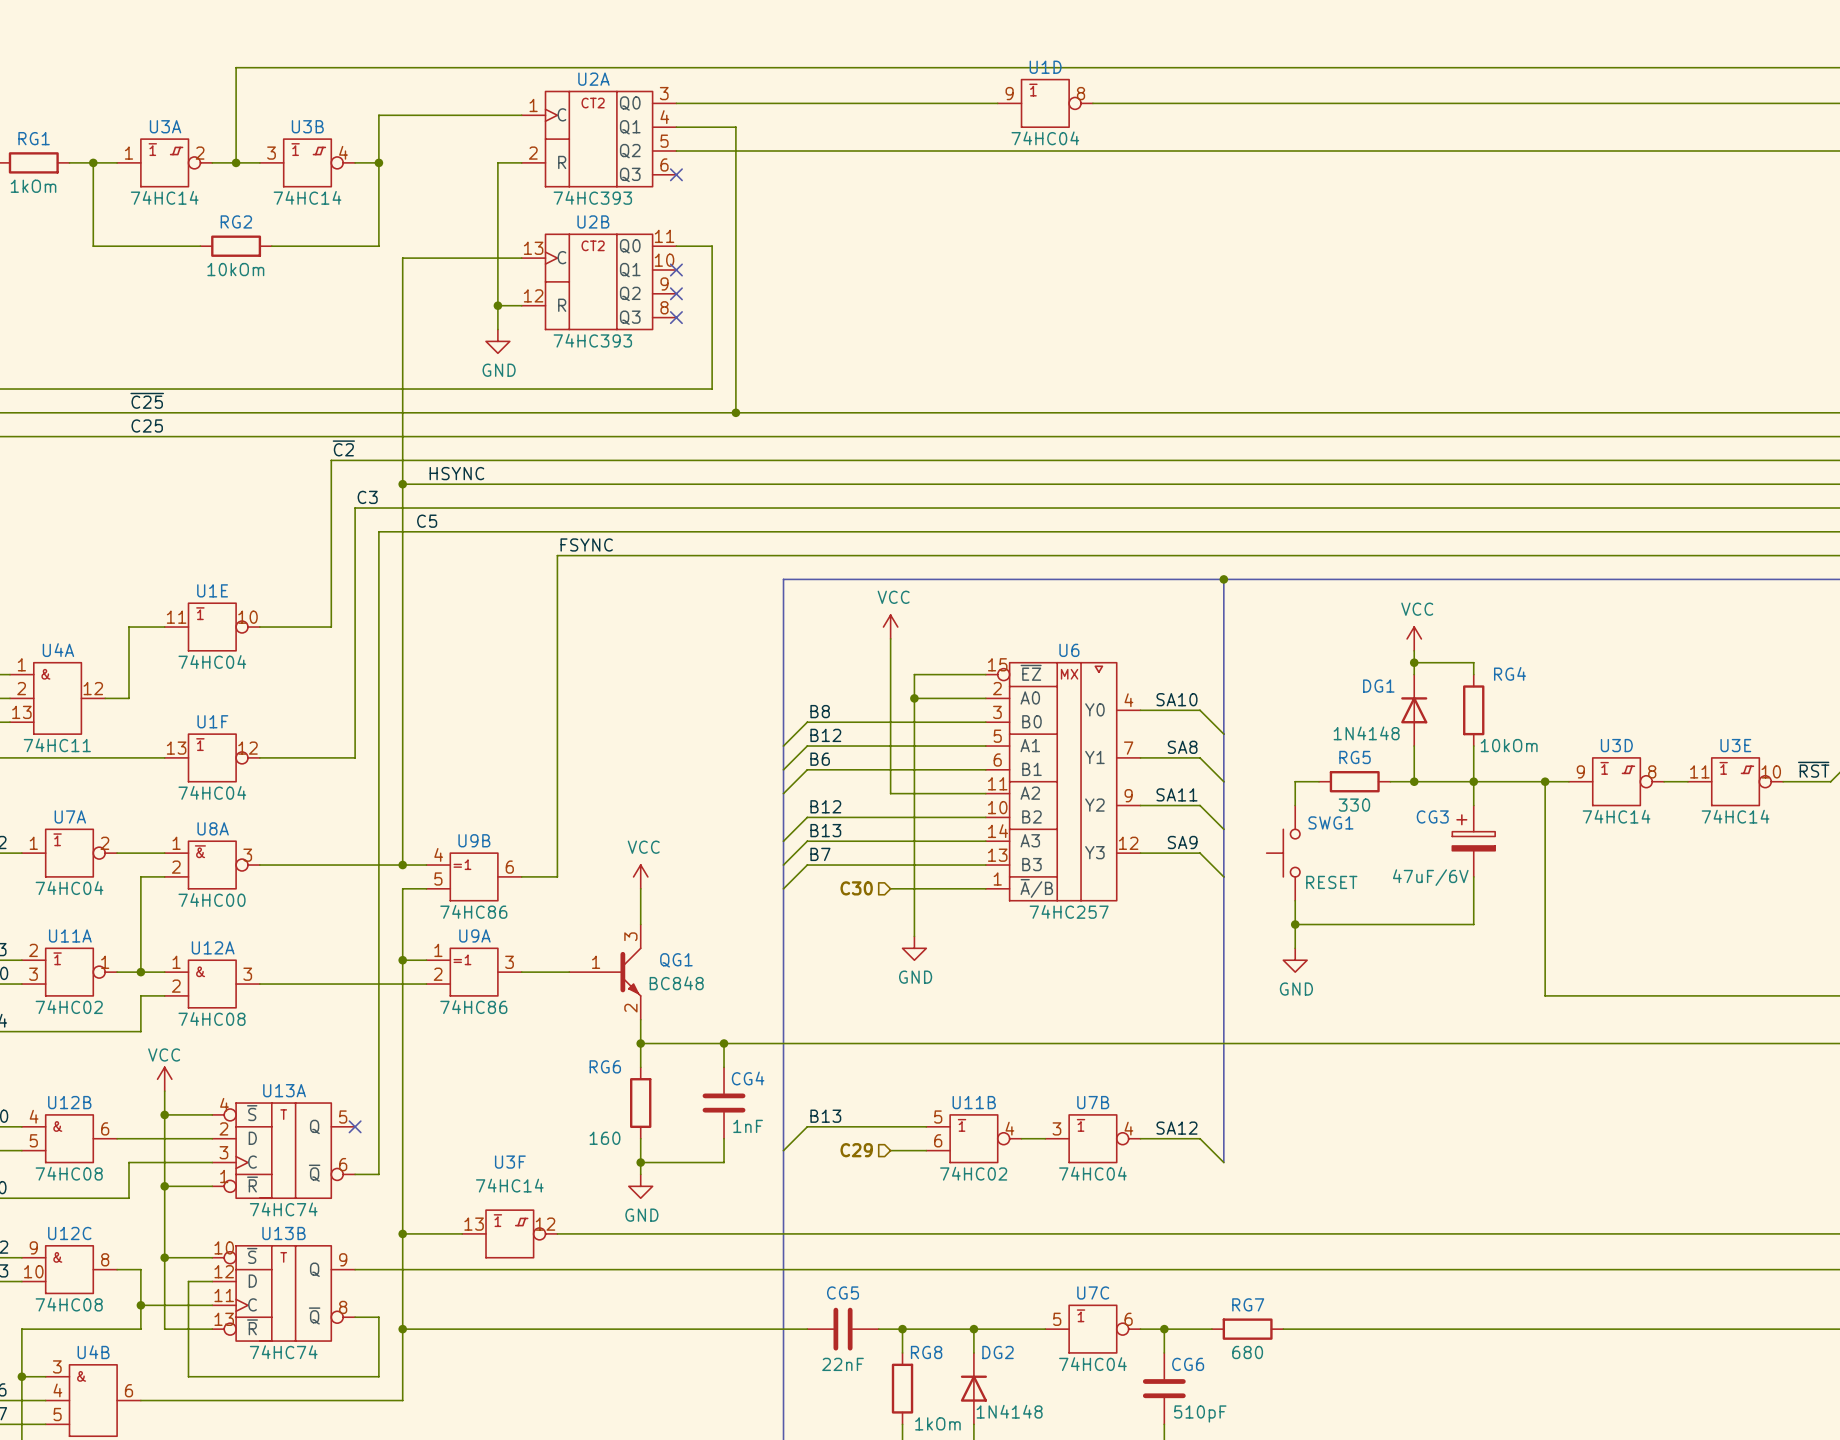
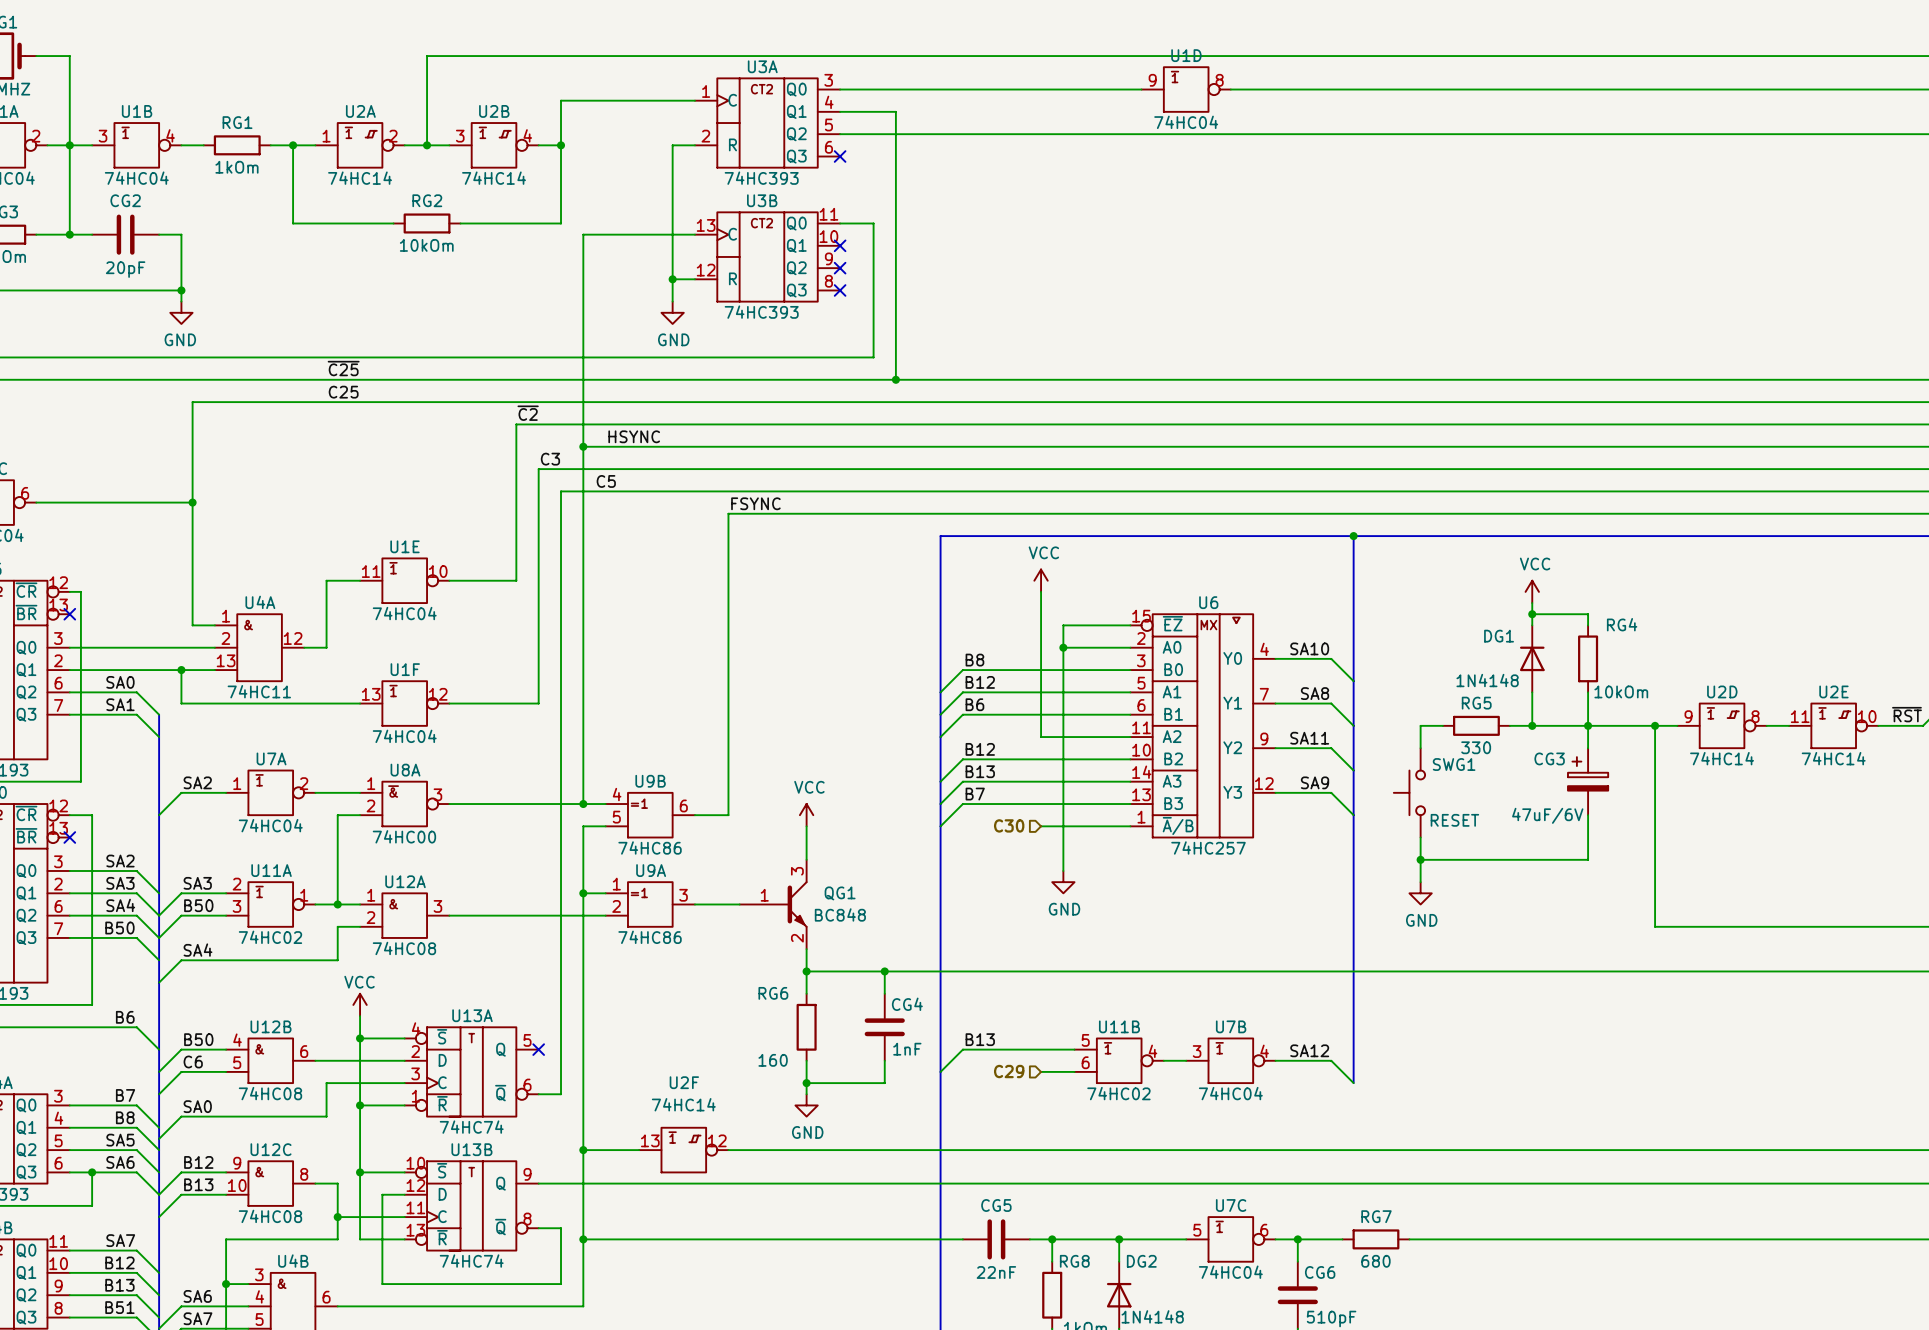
U2A name: U2A (593, 79) -> U3A (762, 66)
U3A name: U3A (165, 126) -> U2A (360, 111)
U3B name: U3B (307, 126) -> U2B (494, 111)
U2B name: U2B (593, 221) -> U3B (762, 200)
U3D name: U3D (1616, 745) -> U2D (1722, 691)
U3E name: U3E (1735, 745) -> U2E (1833, 691)
U3F name: U3F (510, 1162) -> U2F (684, 1082)

